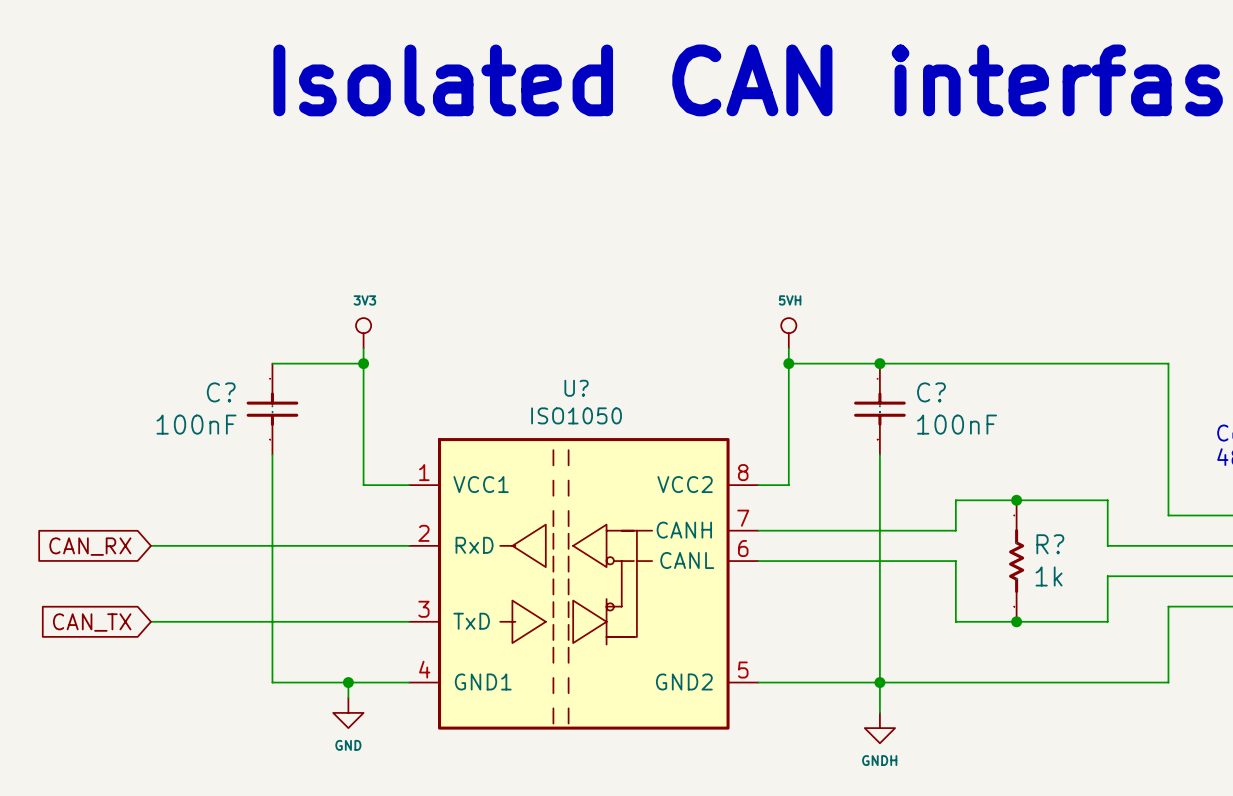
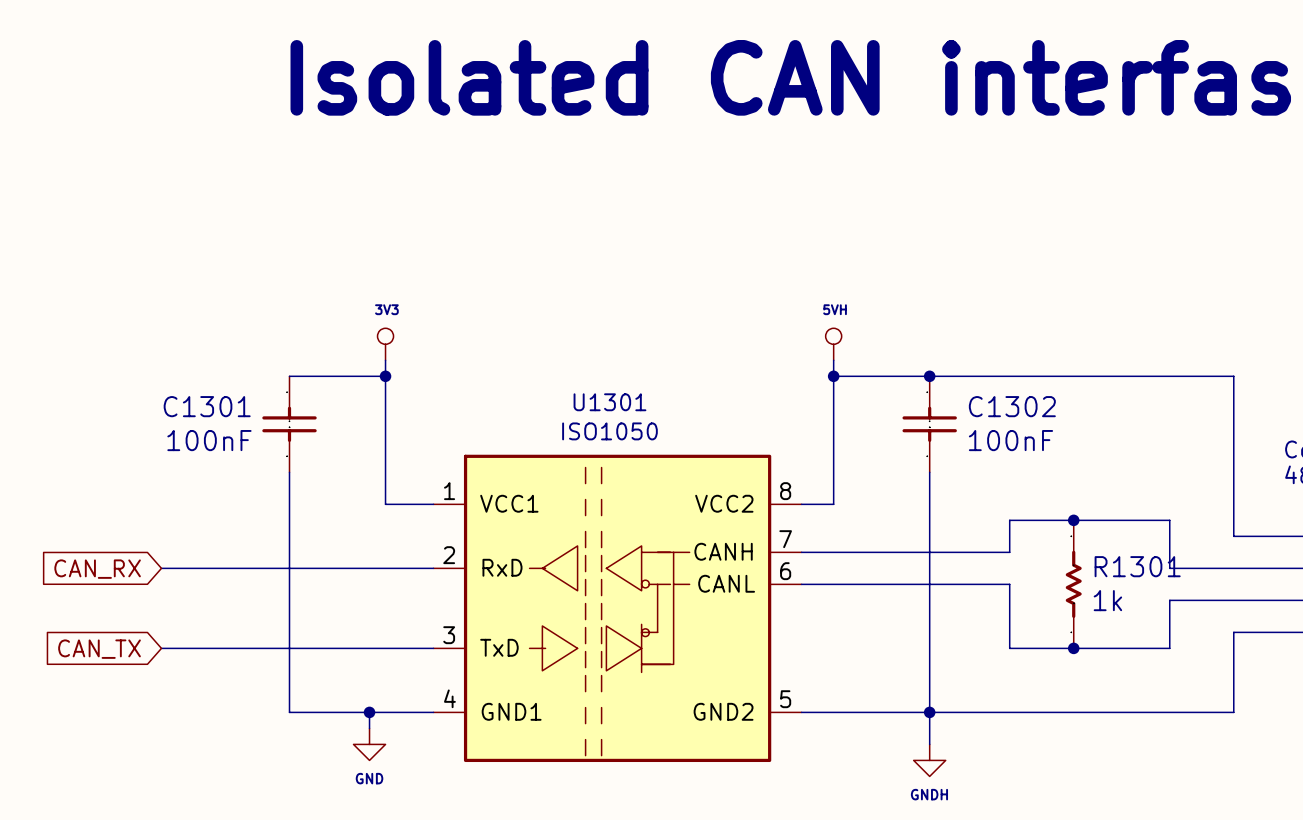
U? name: U? (576, 388) -> U1301 (609, 402)
C? name: C? (221, 392) -> C1301 (207, 406)
C? name: C? (931, 392) -> C1302 (1012, 406)
R? name: R? (1050, 544) -> R1301 (1137, 566)

